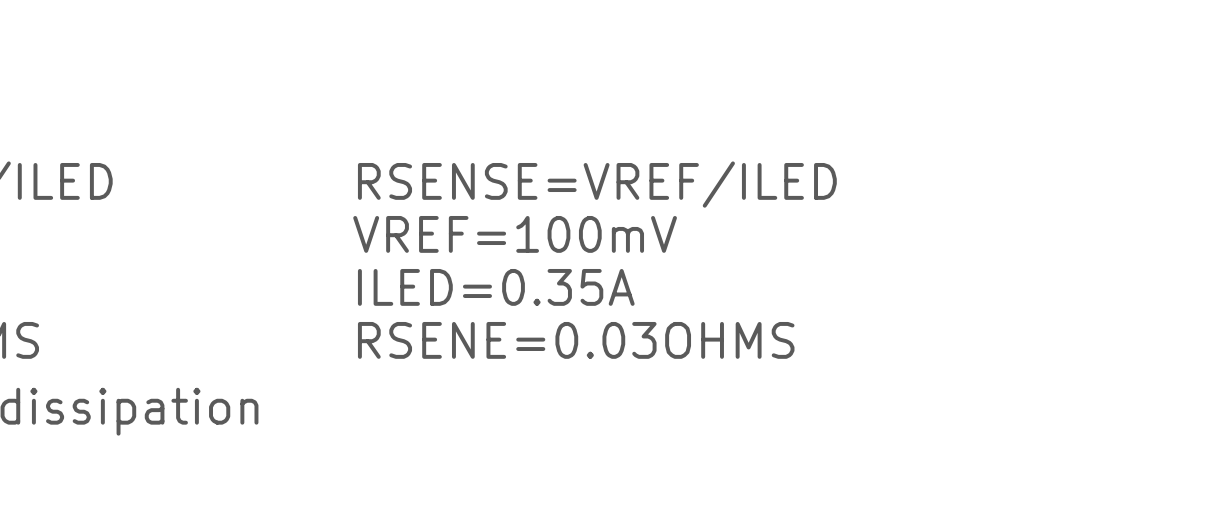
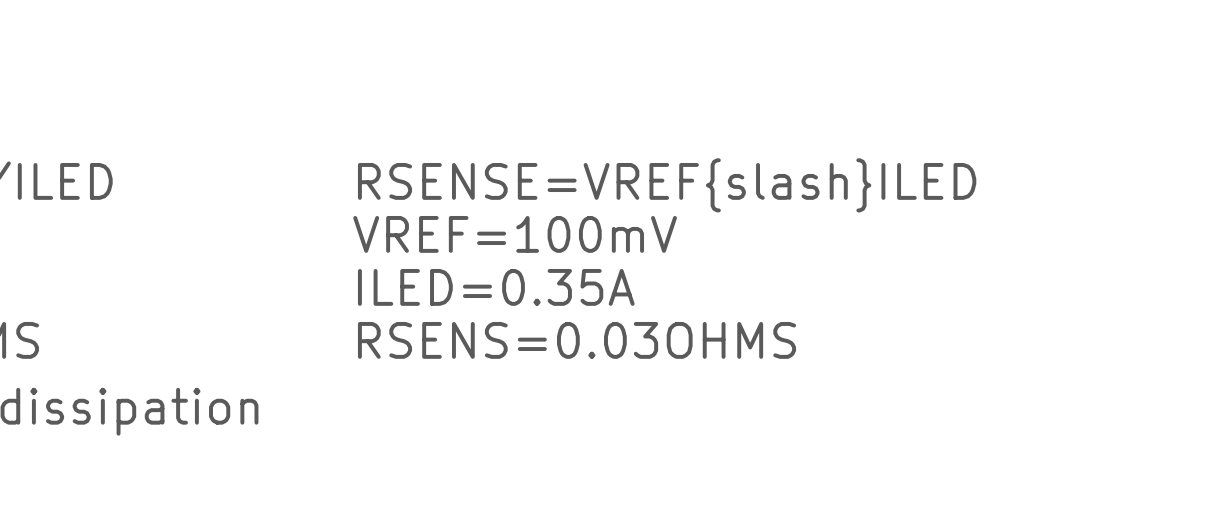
text: RSENSE=VREF/ILED (597, 184) -> RSENSE=VREF{slash}ILED (667, 185)
text: RSENE=0.03OHMS (576, 340) -> RSENS=0.03OHMS (576, 340)

